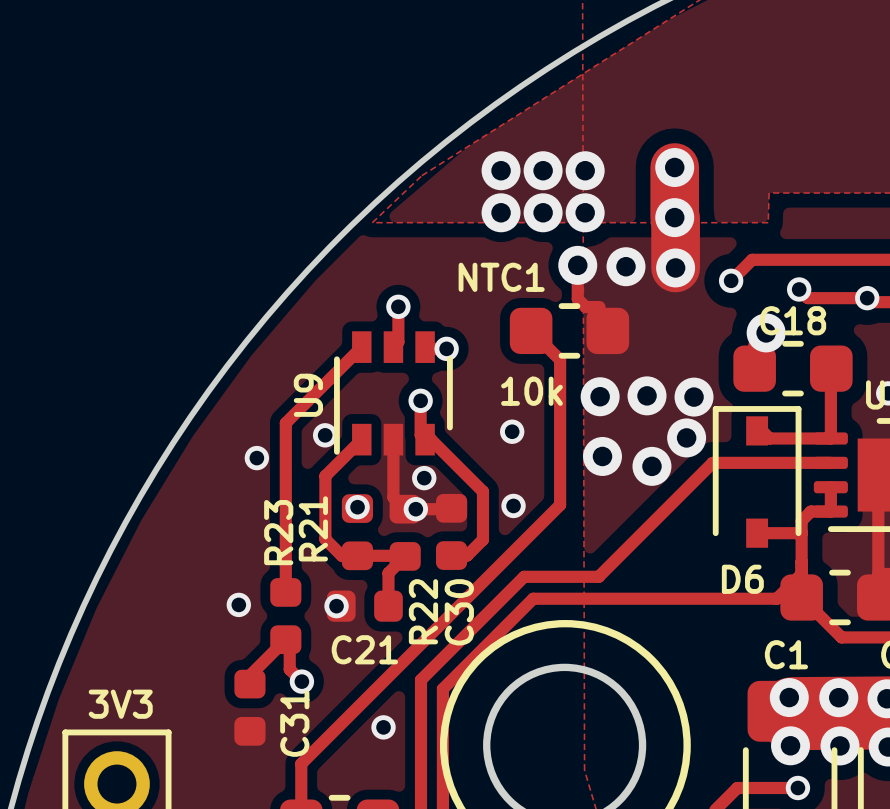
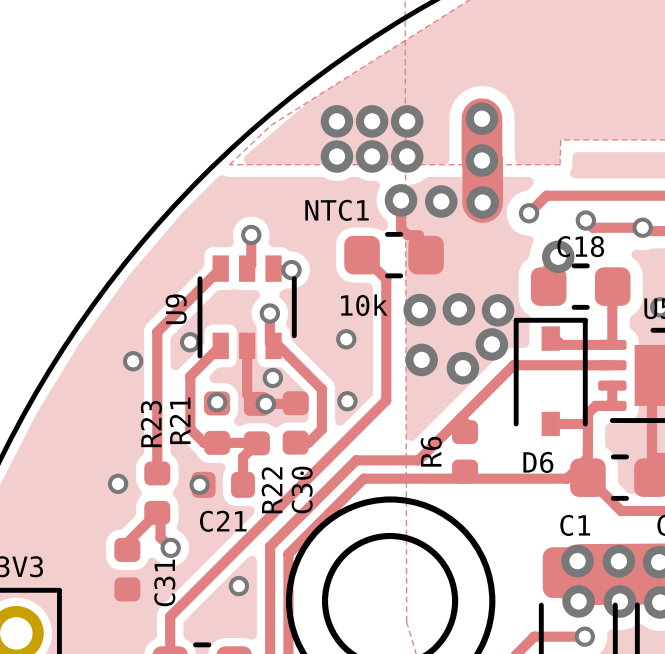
R6: none -> (465, 451)

